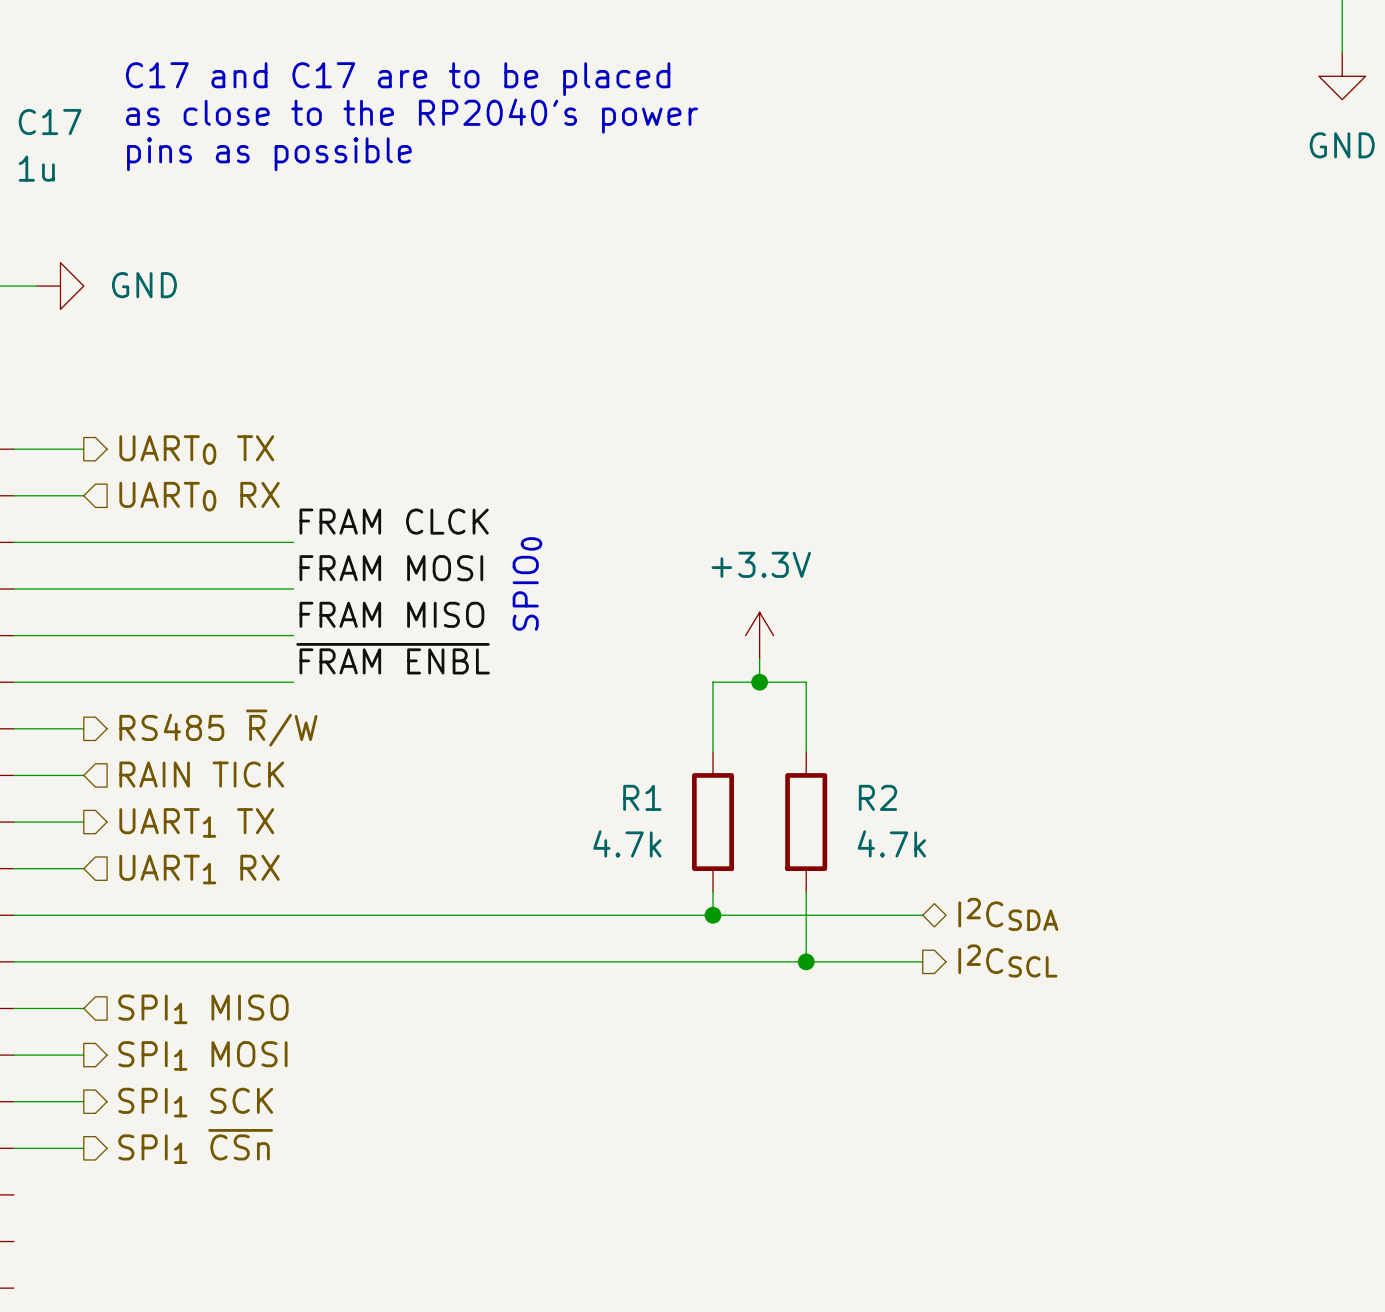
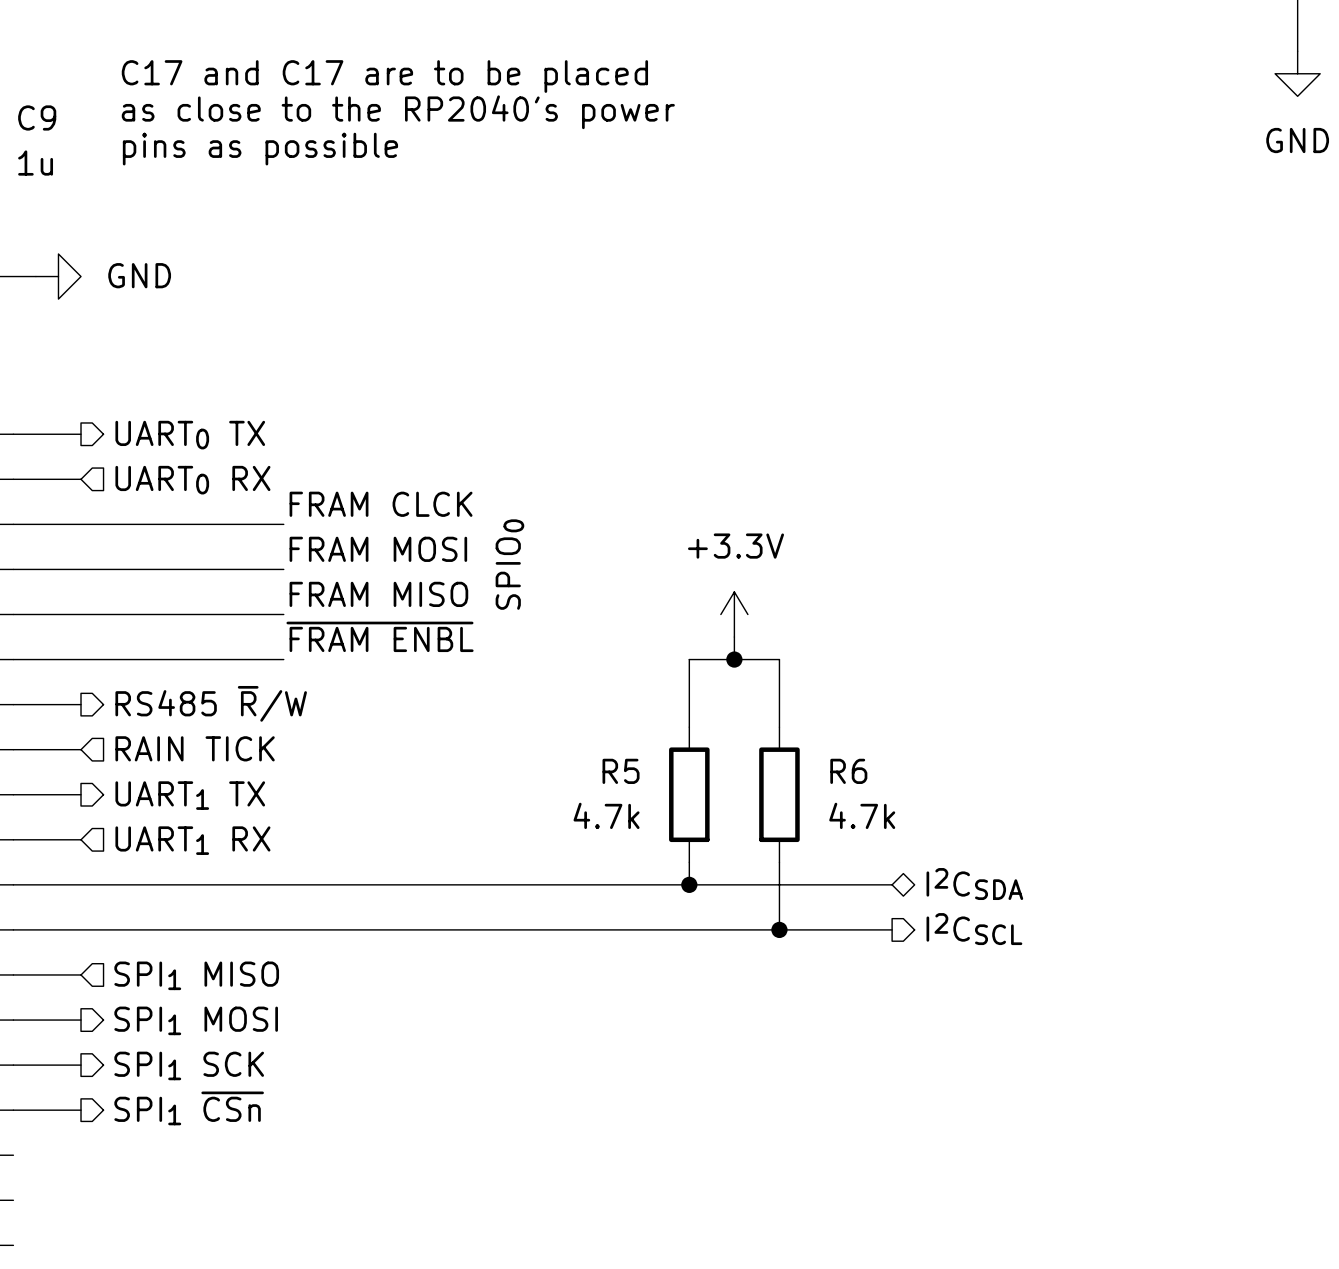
C17 name: C17 (50, 122) -> C9 (37, 117)
R1 name: R1 (642, 797) -> R5 (621, 771)
R2 name: R2 (877, 797) -> R6 (848, 771)

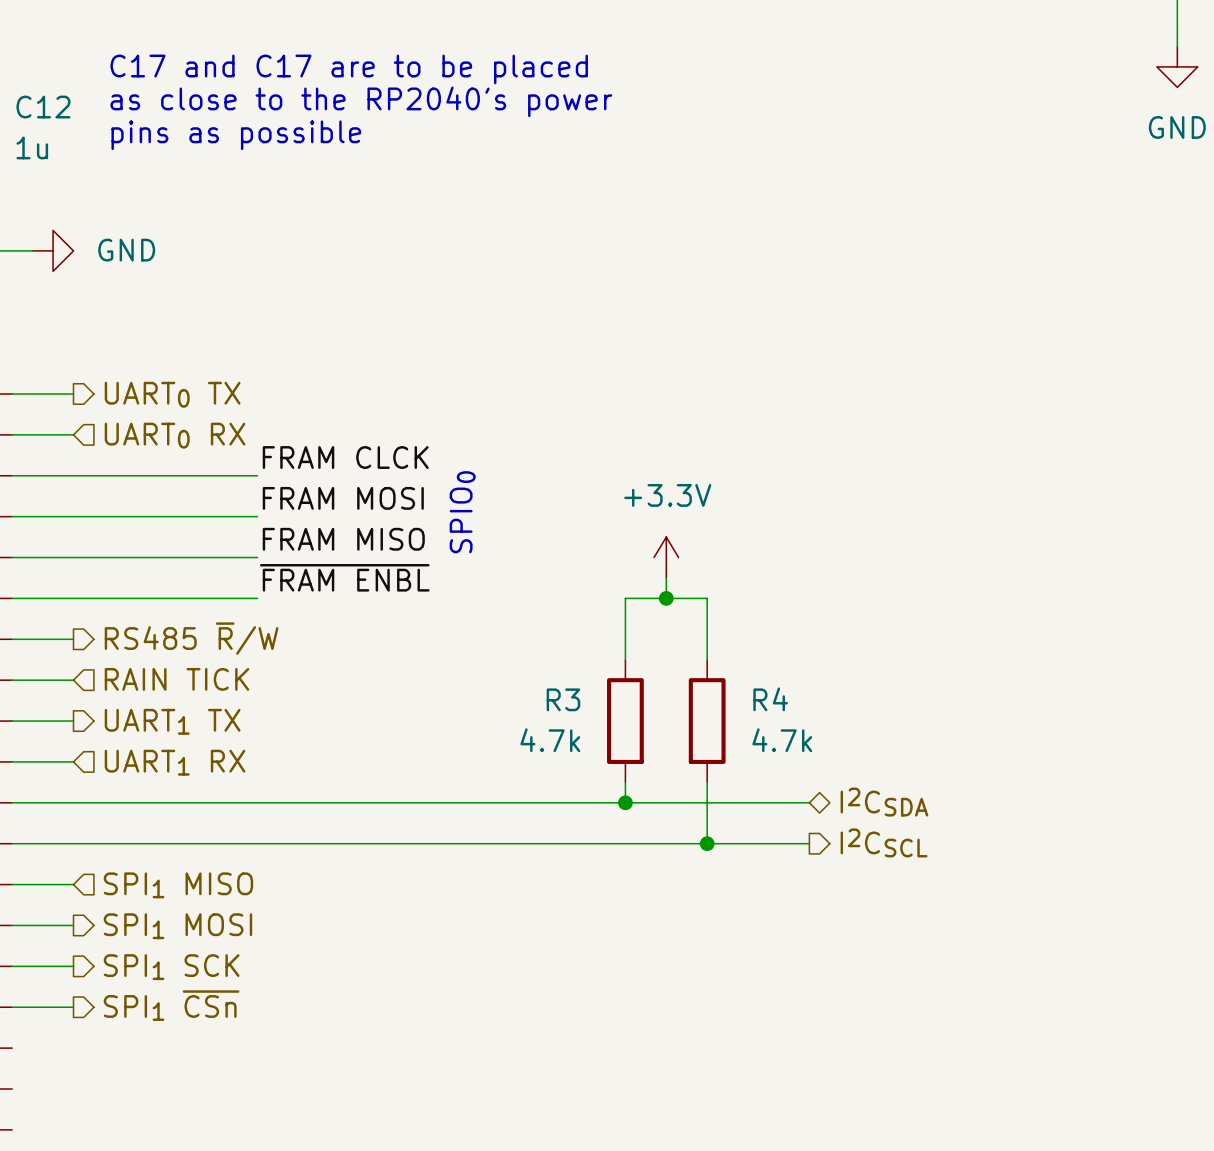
C9 name: C9 (37, 117) -> C12 (43, 107)
R5 name: R5 (621, 771) -> R3 (563, 699)
R6 name: R6 (848, 771) -> R4 (770, 699)

